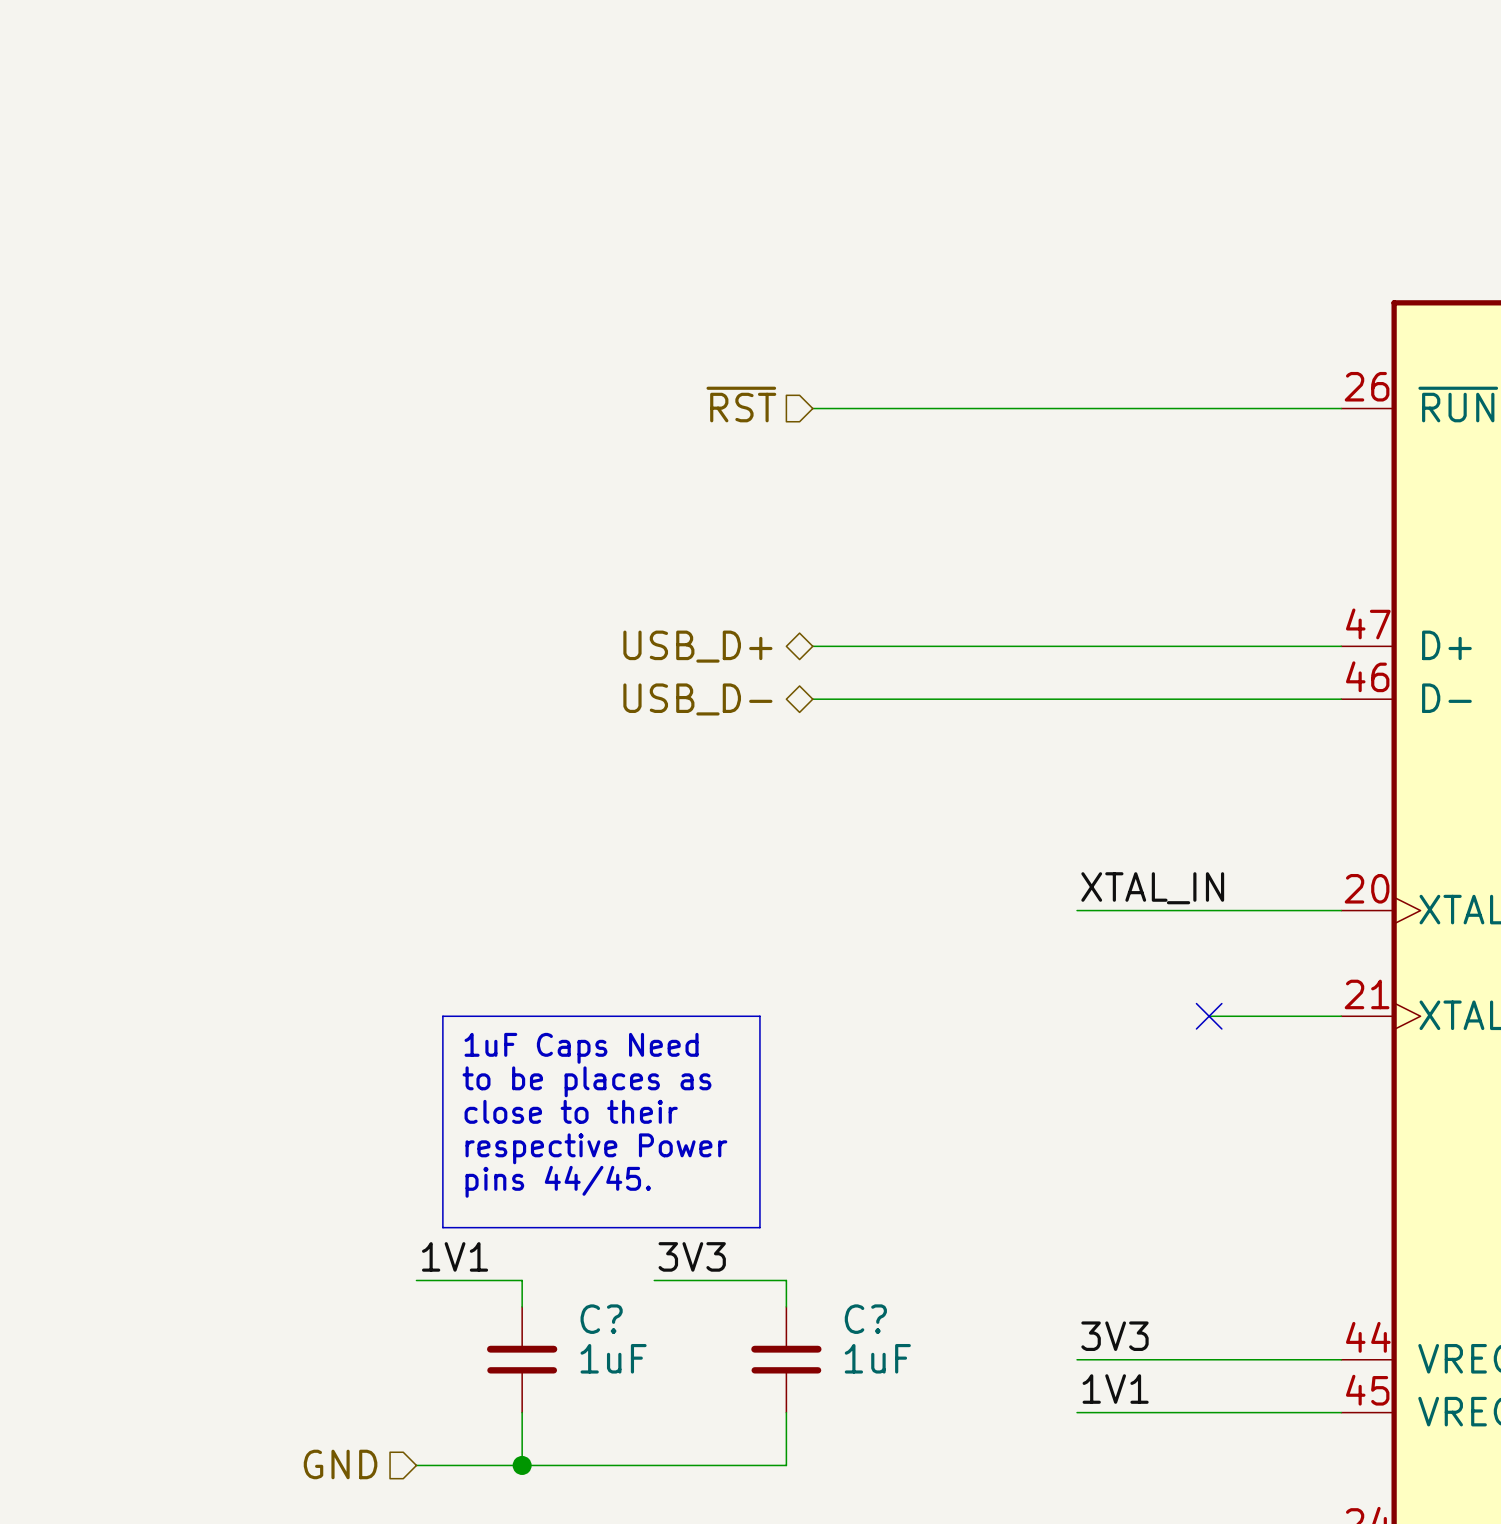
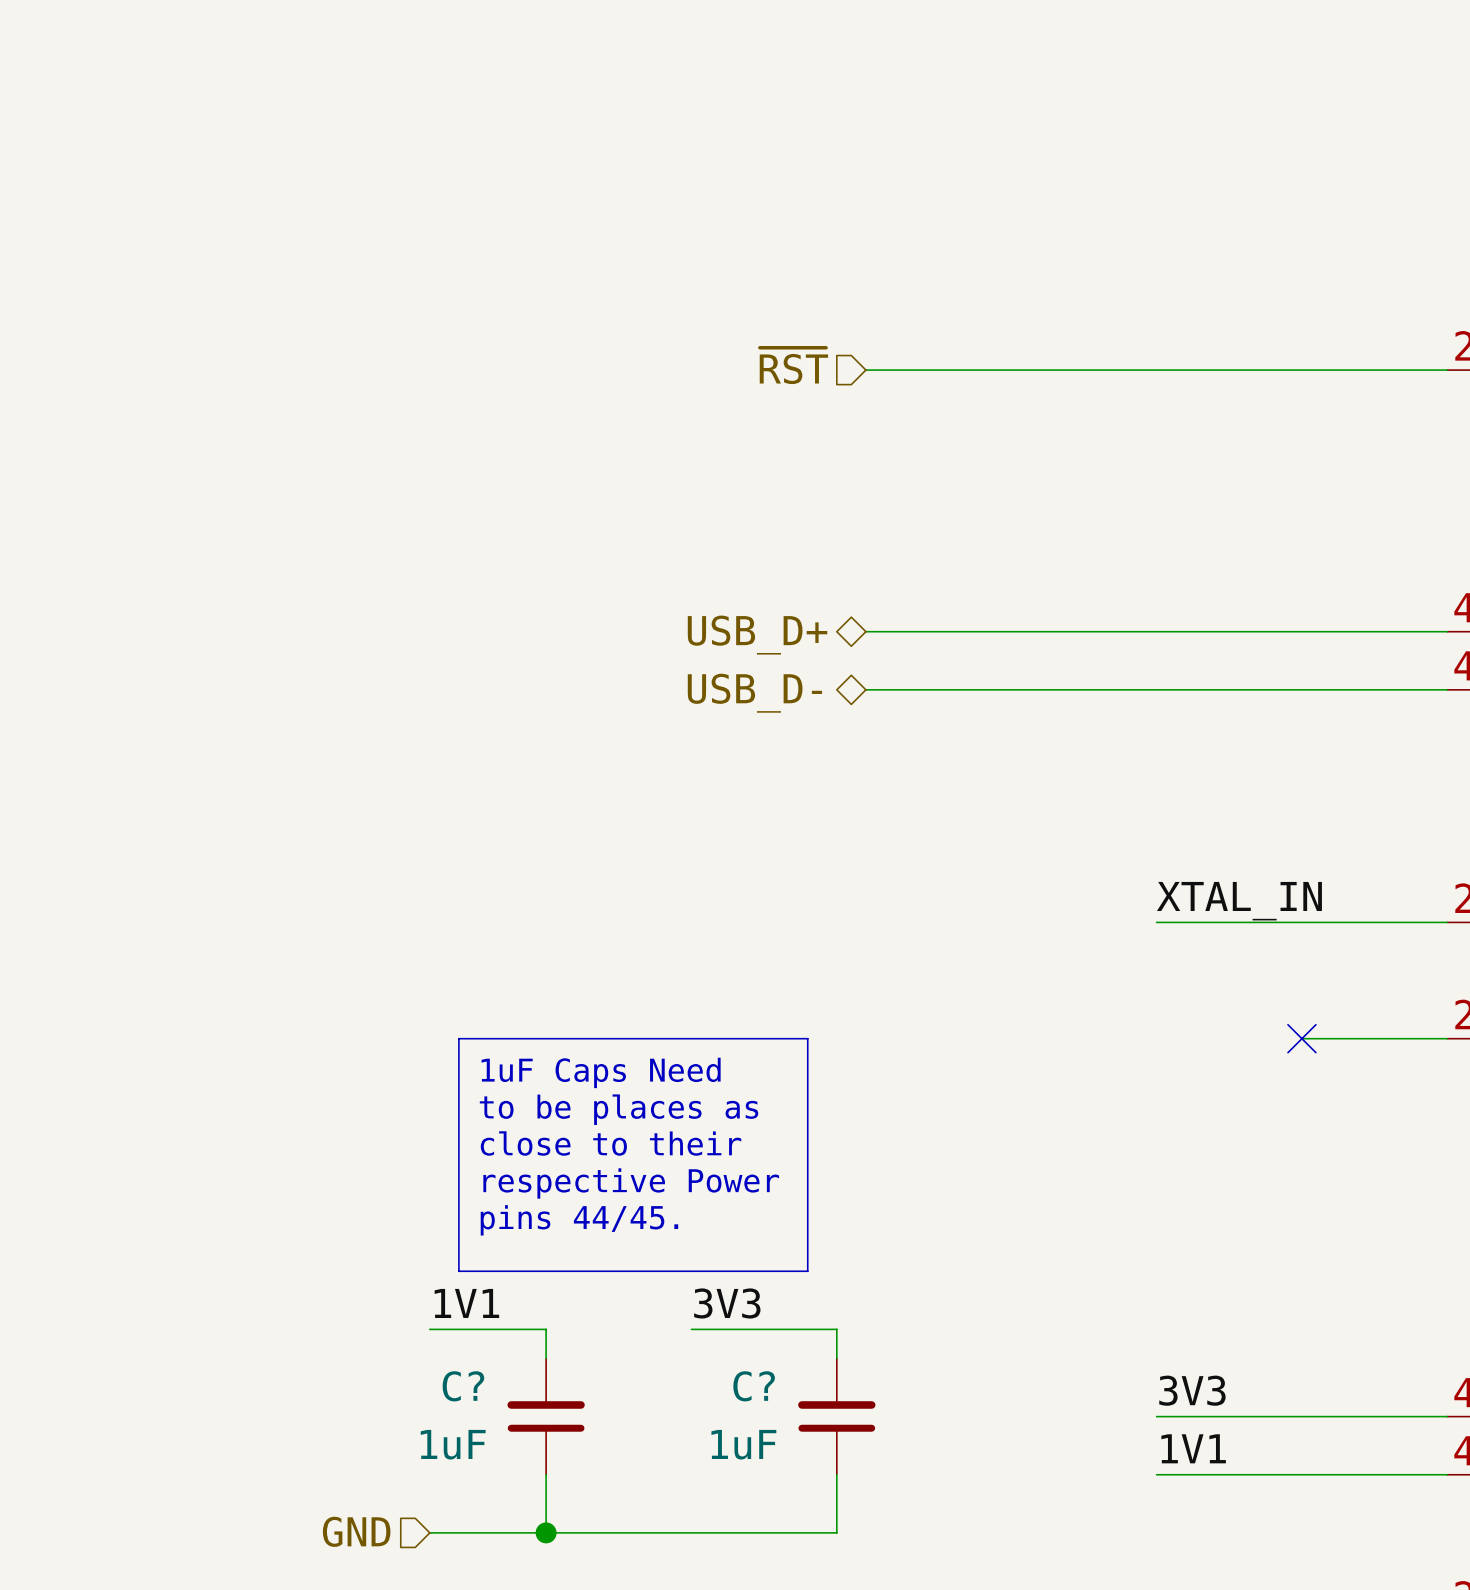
C? name position: C? (601, 1319) -> C? (463, 1386)
C? name position: C? (865, 1319) -> C? (754, 1386)
C? value position: 1uF (613, 1358) -> 1uF (453, 1444)
C? value position: 1uF (877, 1358) -> 1uF (743, 1444)

